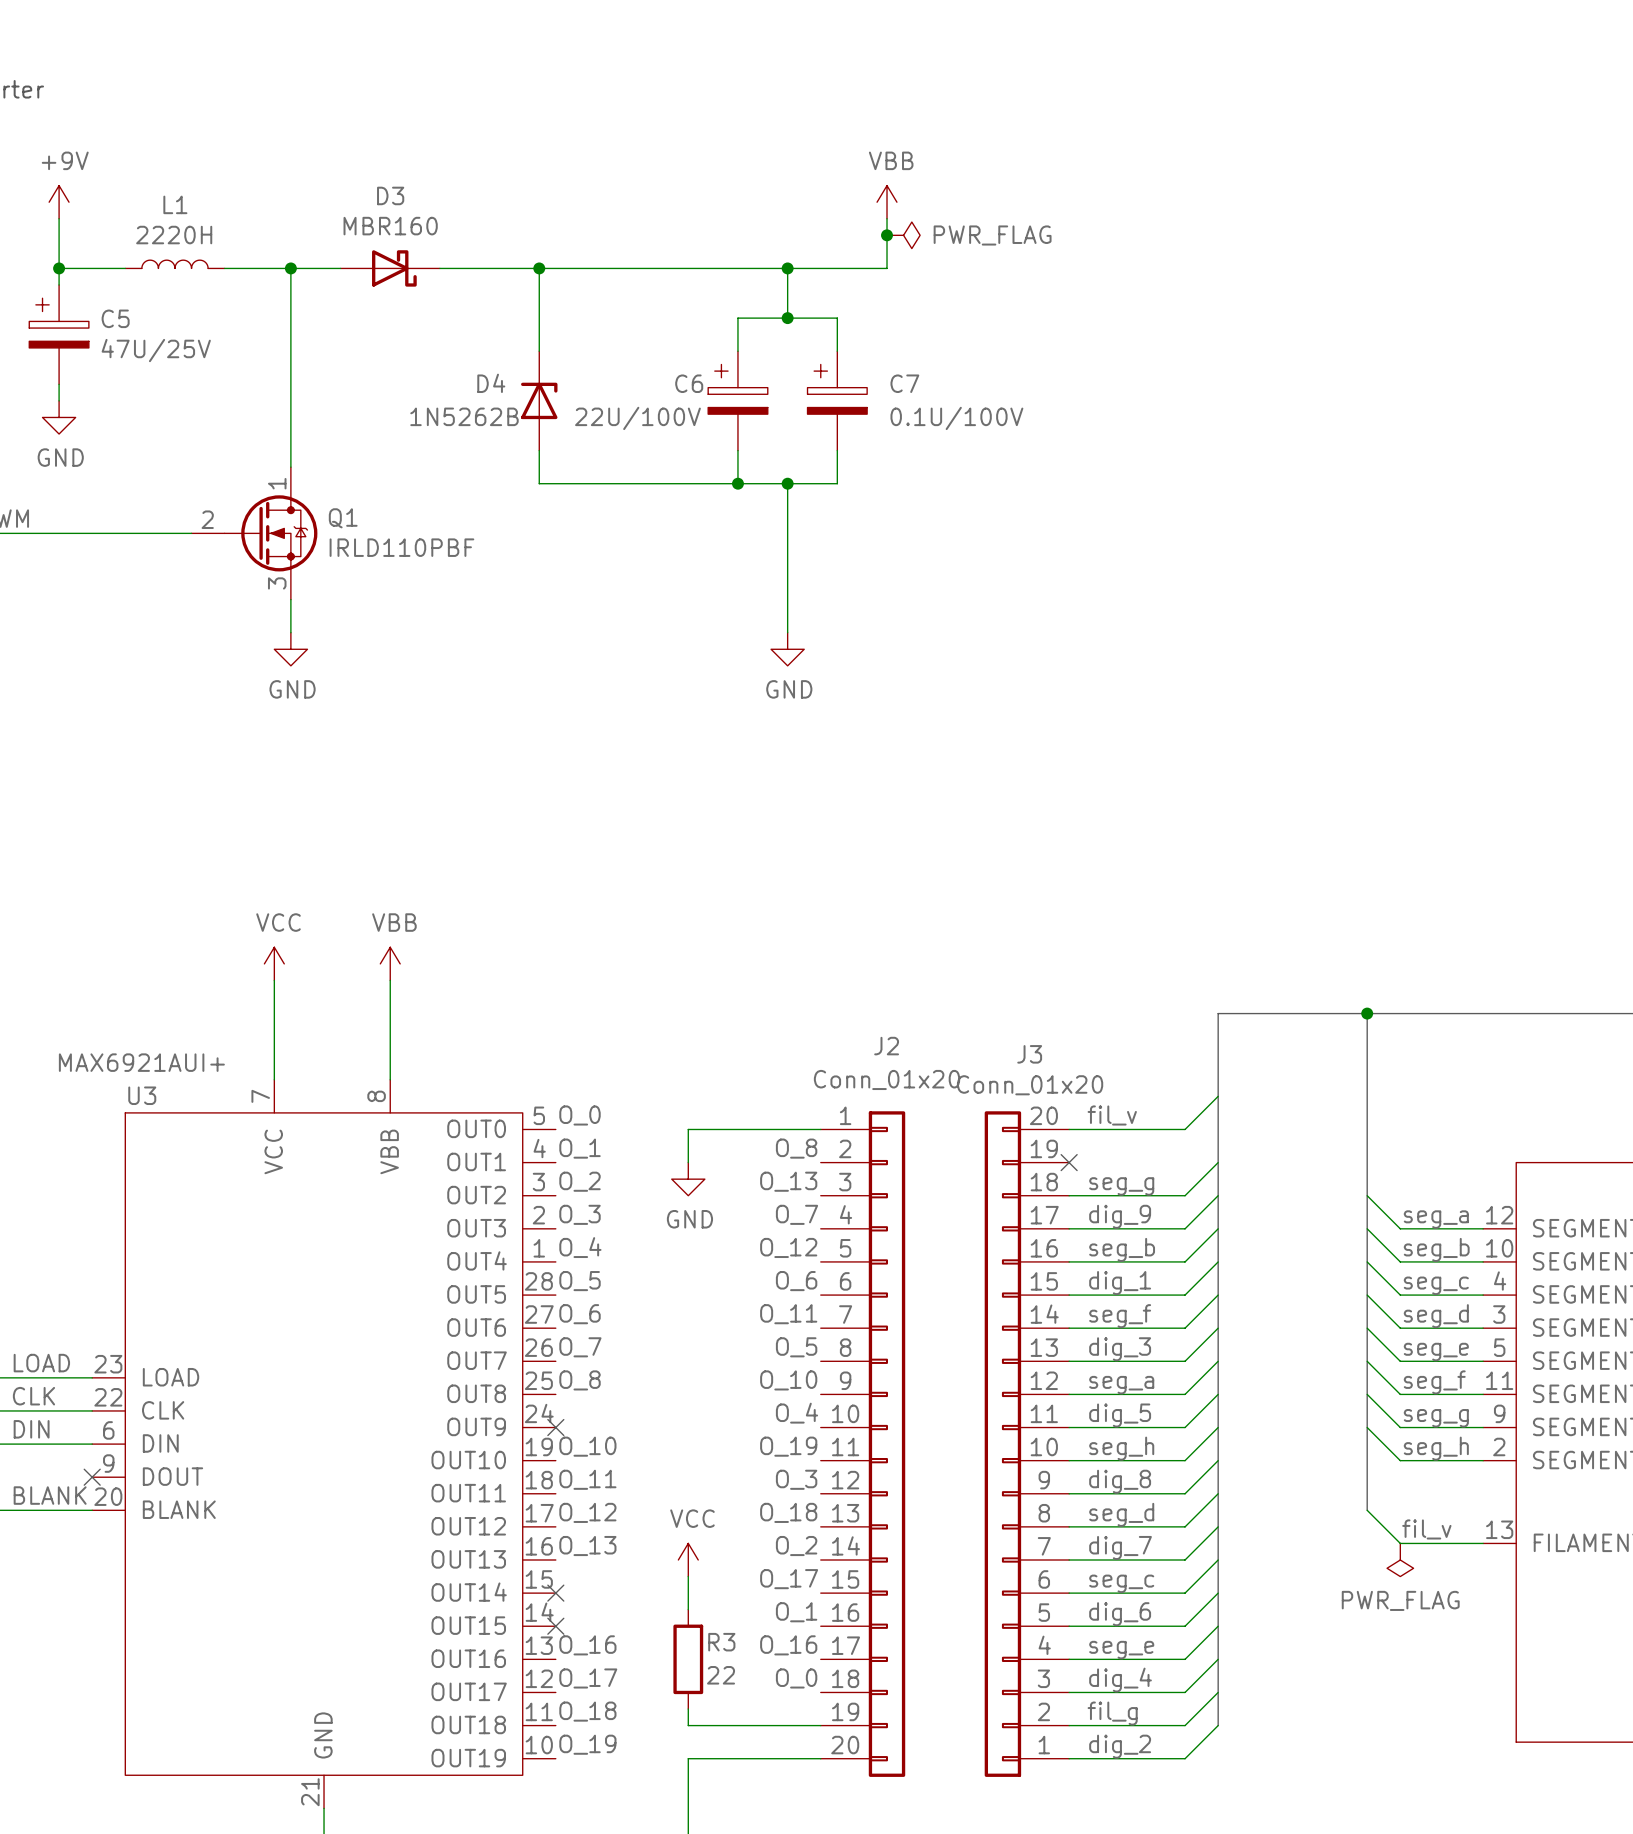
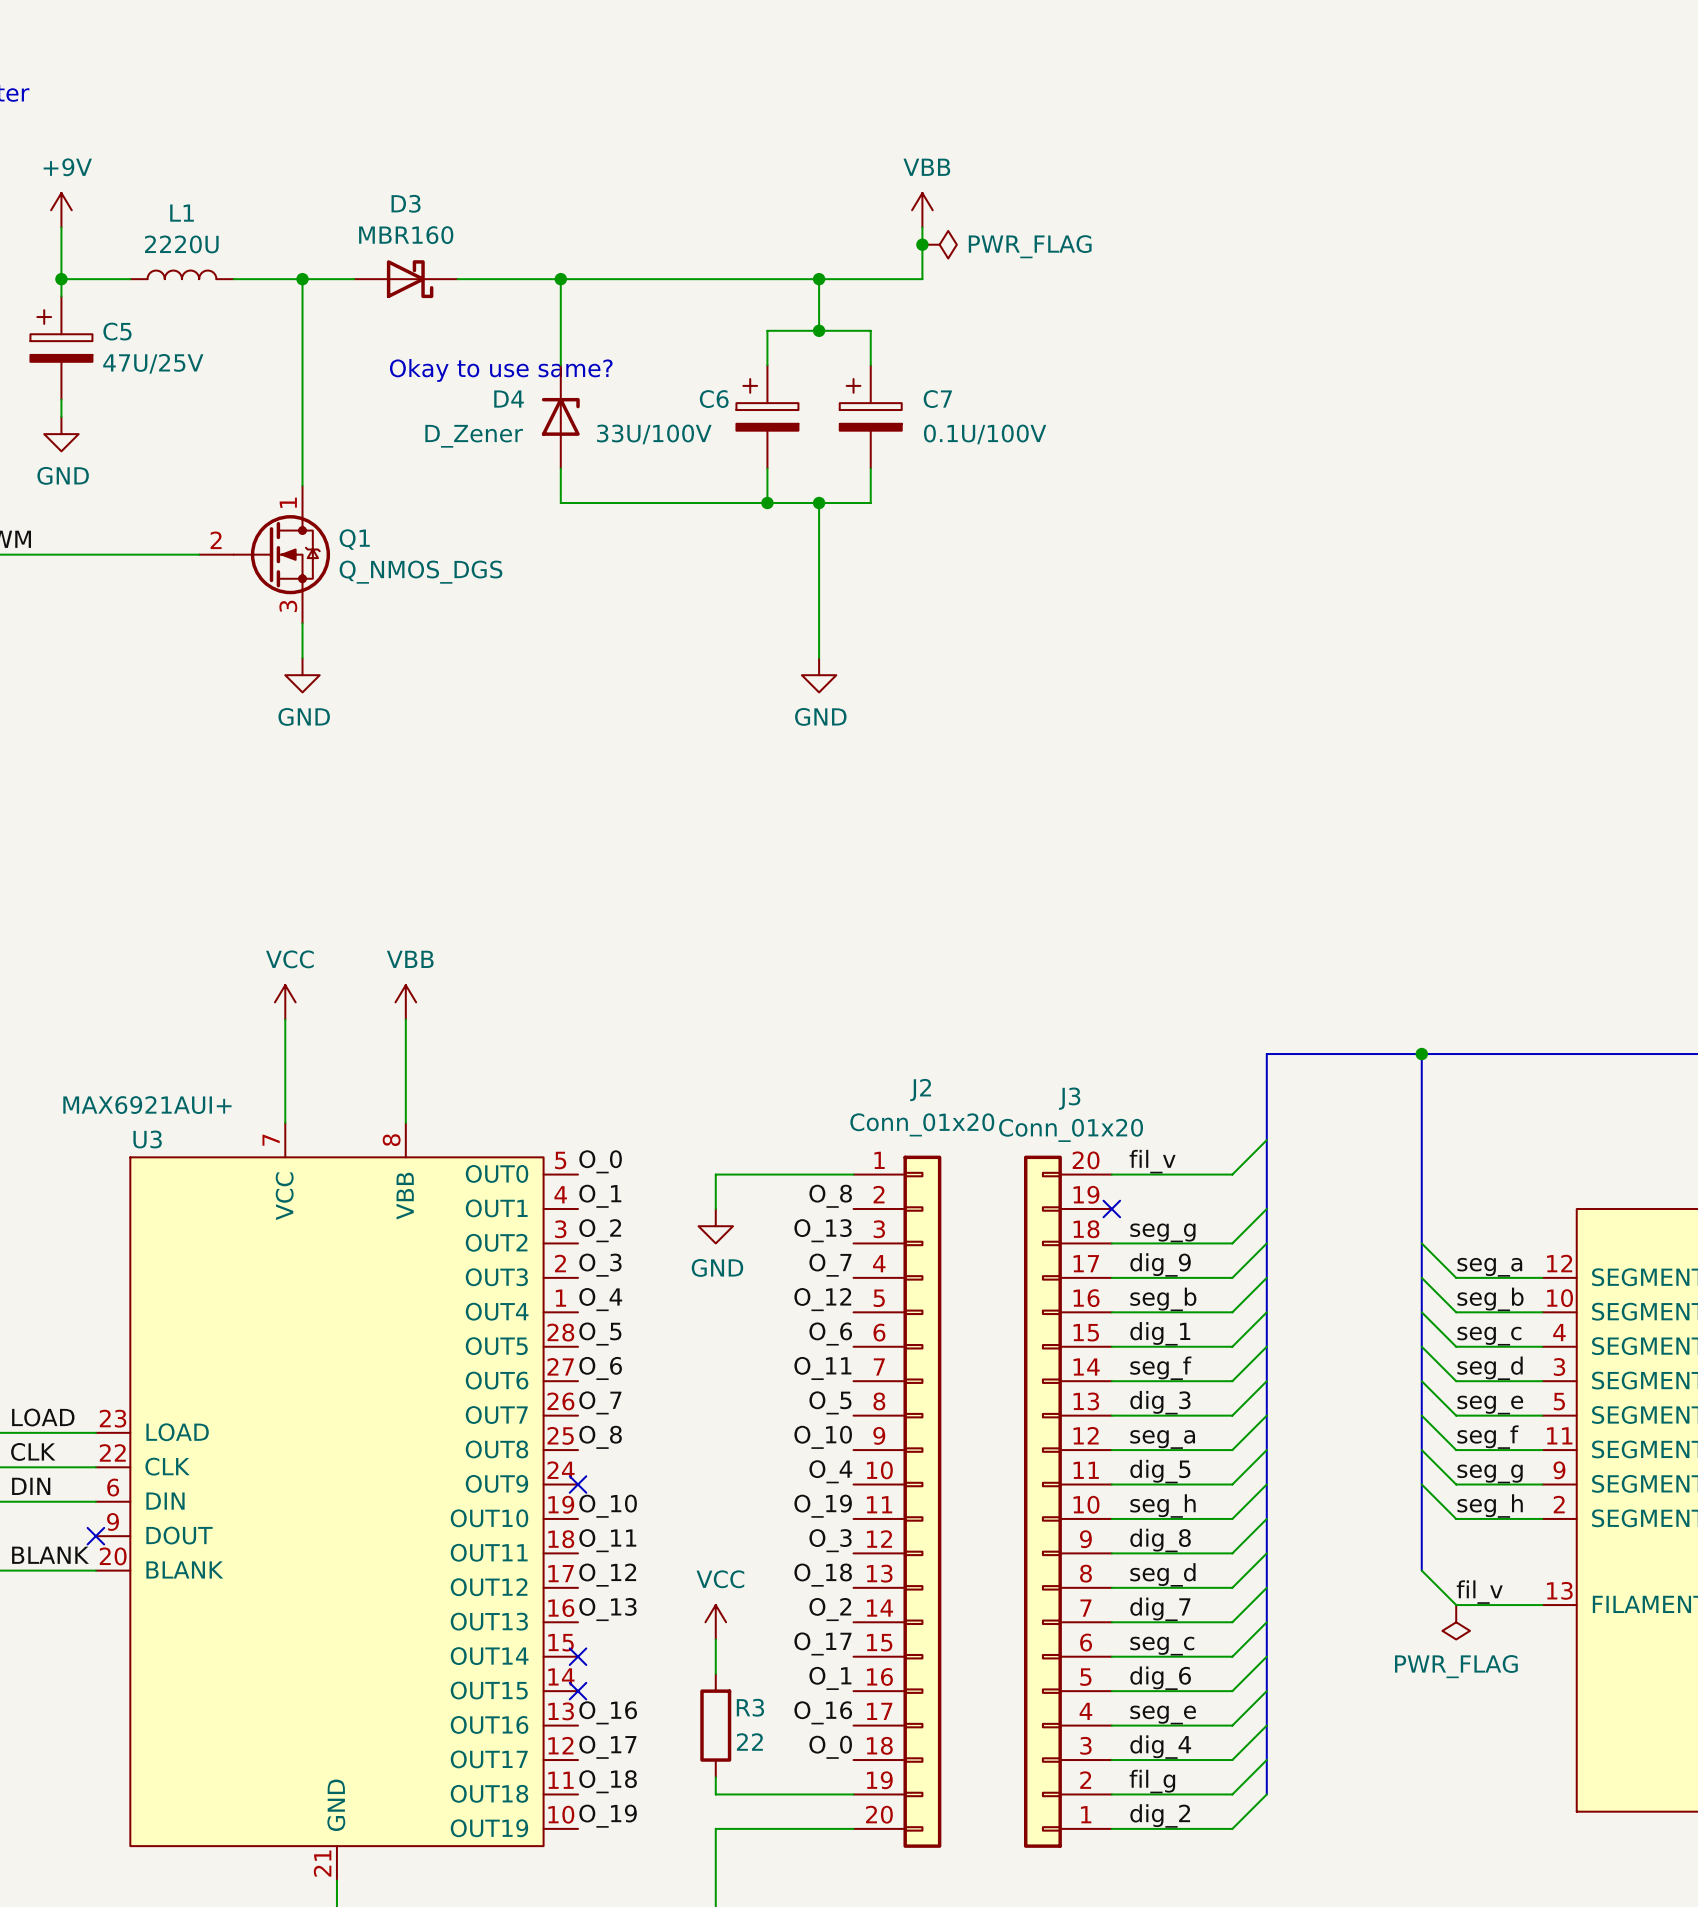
L1 value: 2220H (174, 235) -> 2220U (181, 244)
text: none -> Okay to use same? (501, 370)
D4 value: 1N5262B (464, 416) -> D_Zener (474, 436)
C6 value: 22U/100V (637, 418) -> 33U/100V (654, 434)
Q1 value: IRLD110PBF (401, 547) -> Q_NMOS_DGS (420, 572)

